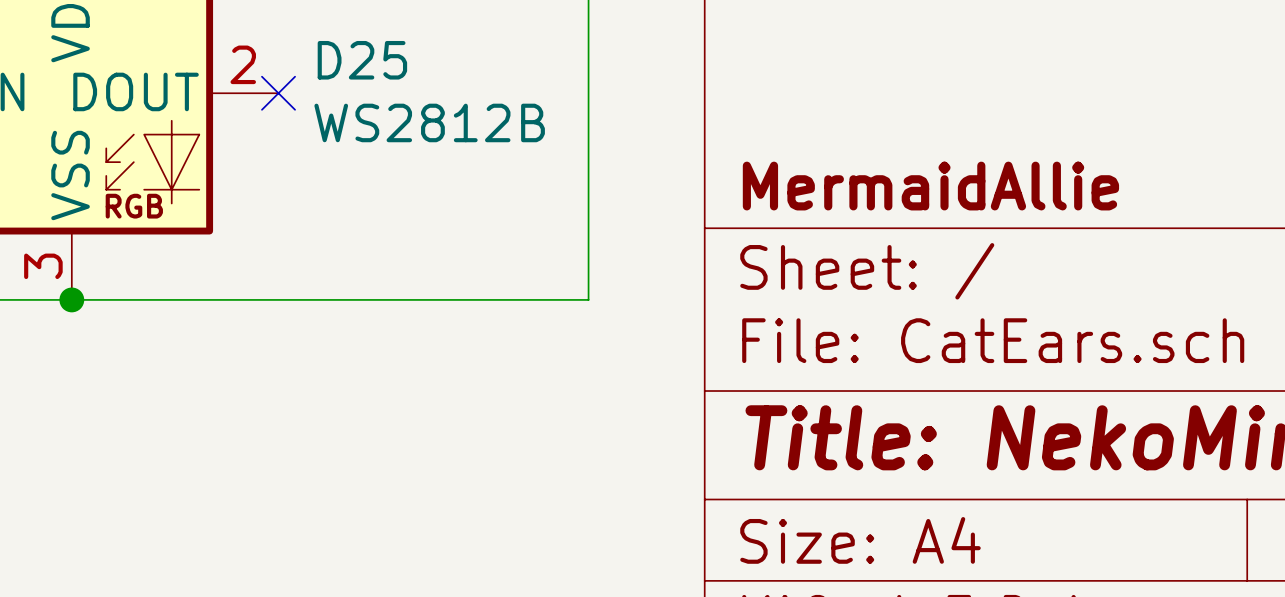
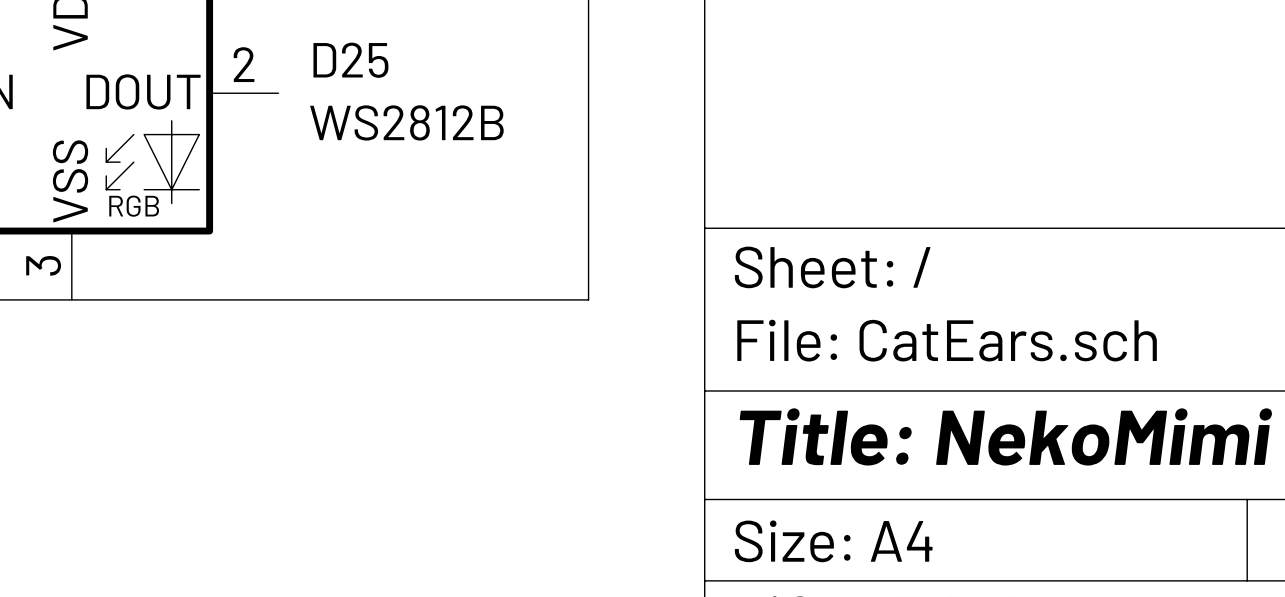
no-connect mark: (278, 93) -> none
title block: MermaidAllie (930, 186) -> none
junction: (71, 299) -> none

